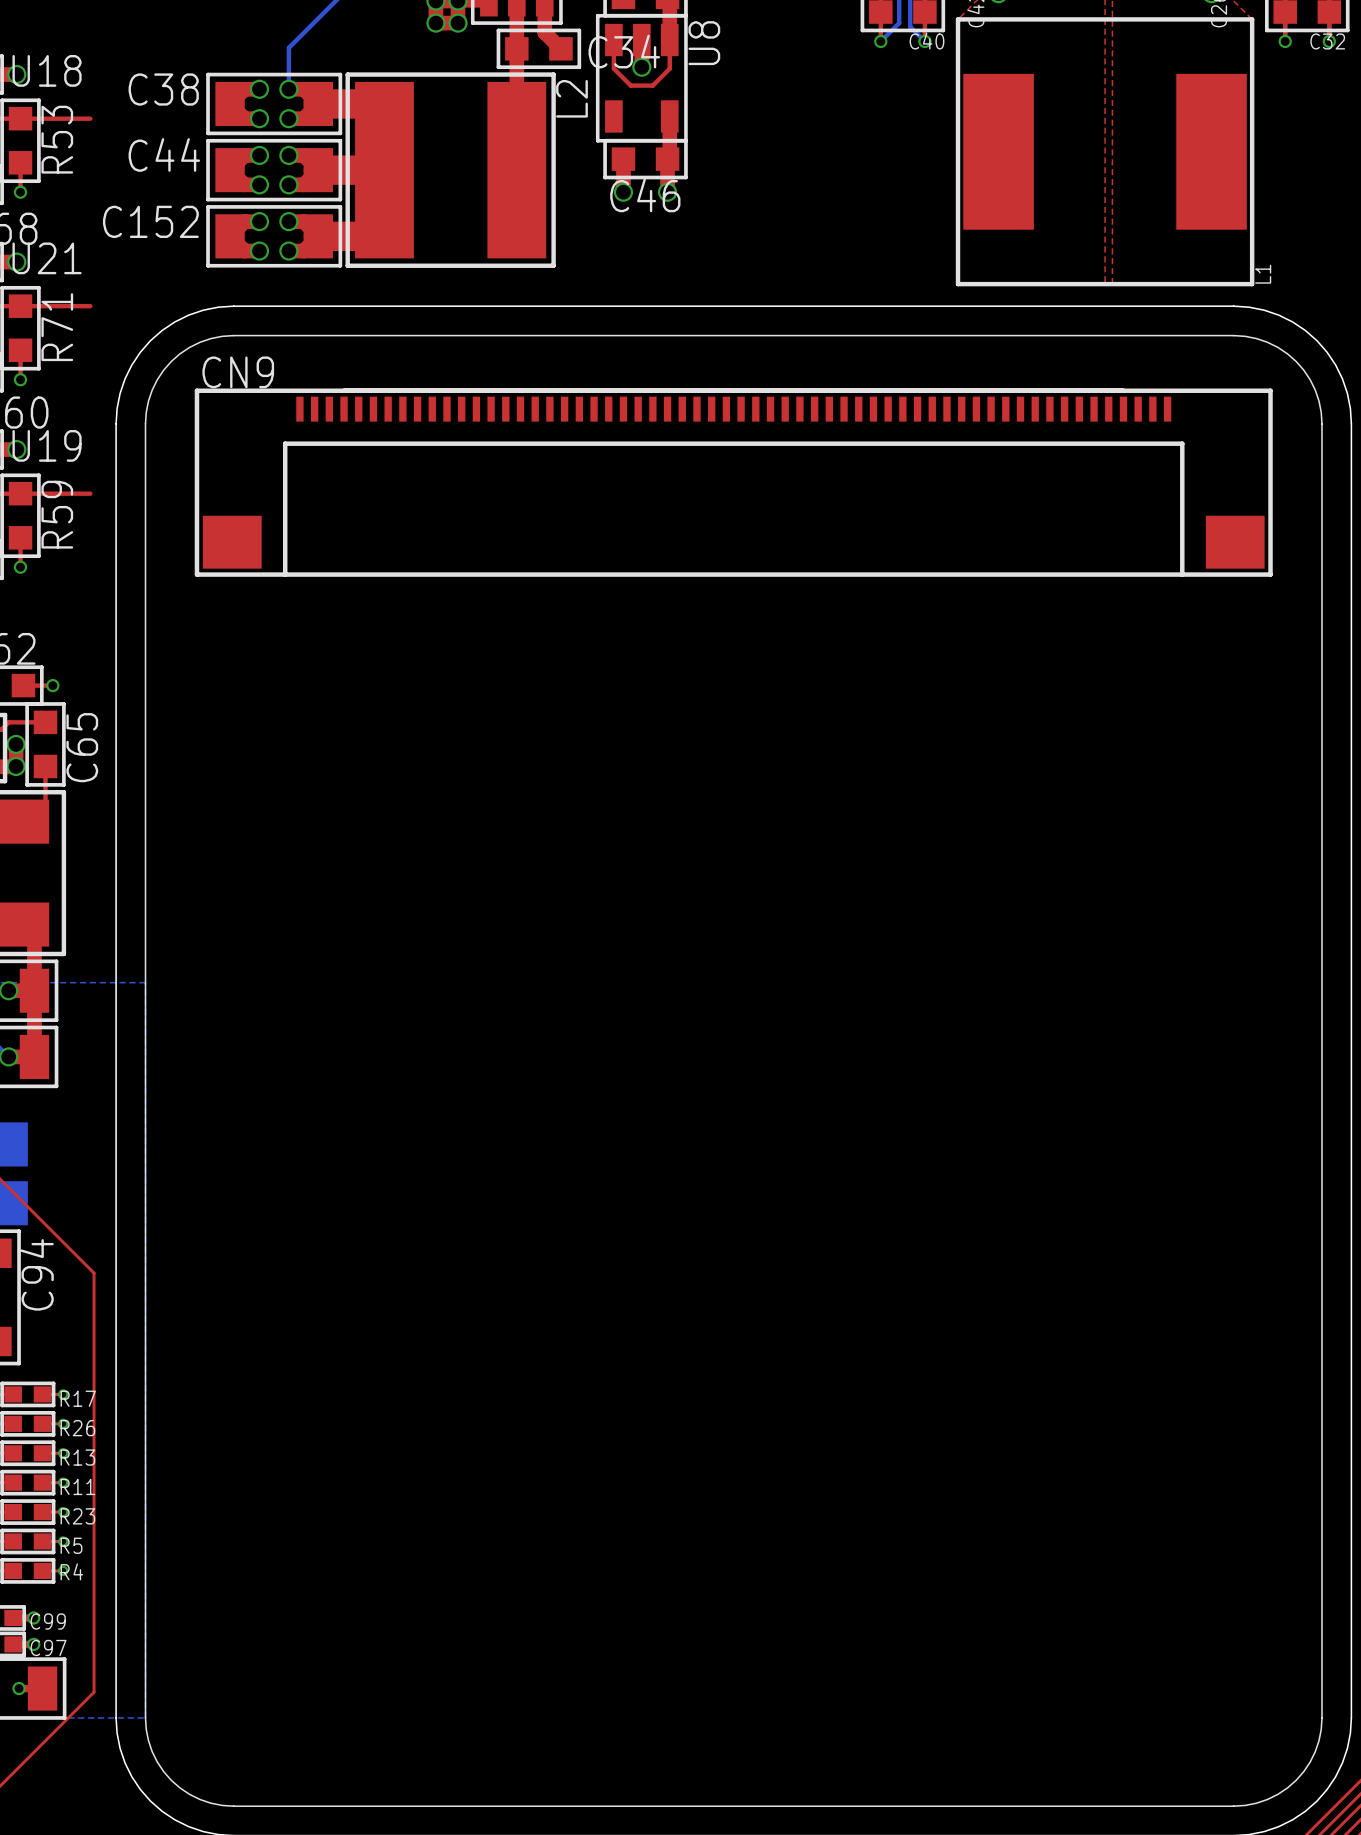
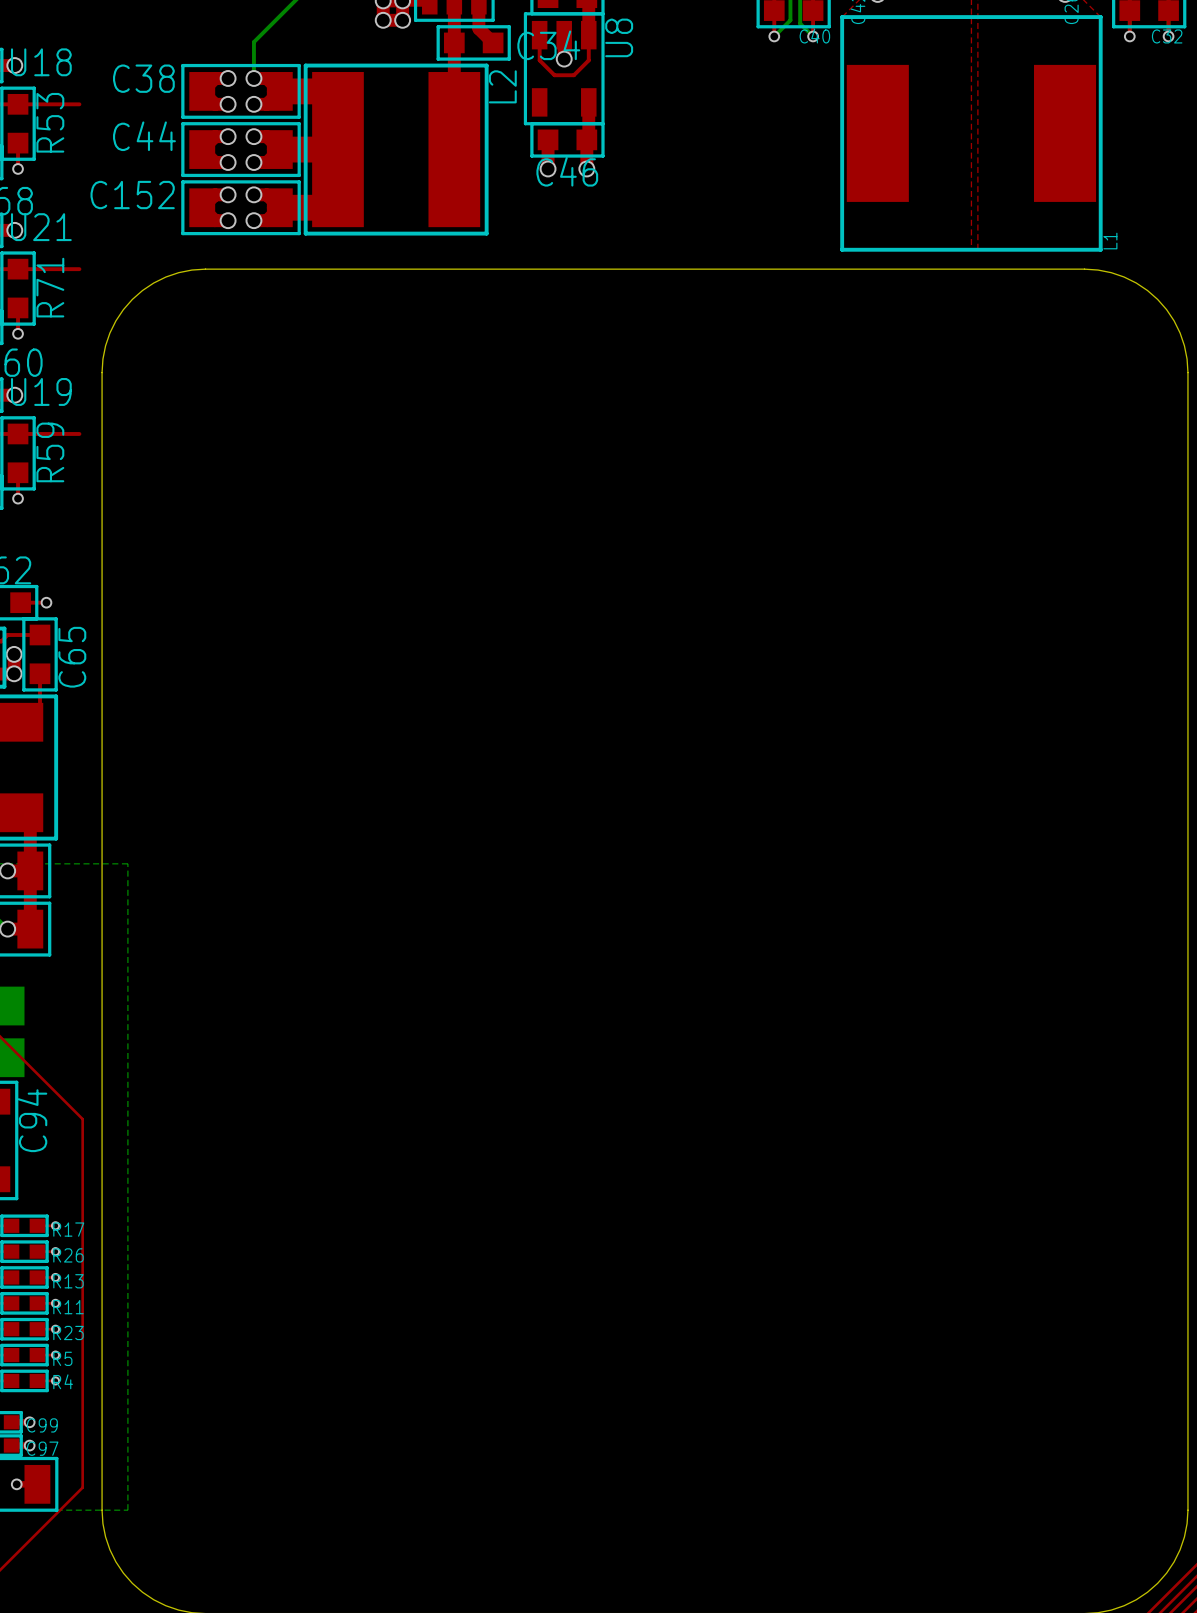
line: (233, 335) (1233, 335) (1256, 338) (1277, 347) (1287, 353) (1303, 370) (1310, 379) (1318, 400) (1321, 423) (1321, 1717) (1318, 1740) (1310, 1762) (1303, 1771) (1287, 1787) (1277, 1794) (1256, 1803) (1233, 1806) (233, 1806) (210, 1803) (189, 1794) (180, 1787) (163, 1771) (157, 1762) (148, 1740) (145, 1717) (145, 423) (148, 400) (152, 390) (163, 370) (171, 361) (180, 353) (199, 342) (210, 338) (233, 335) -> none
CN9: (733, 482) -> none

